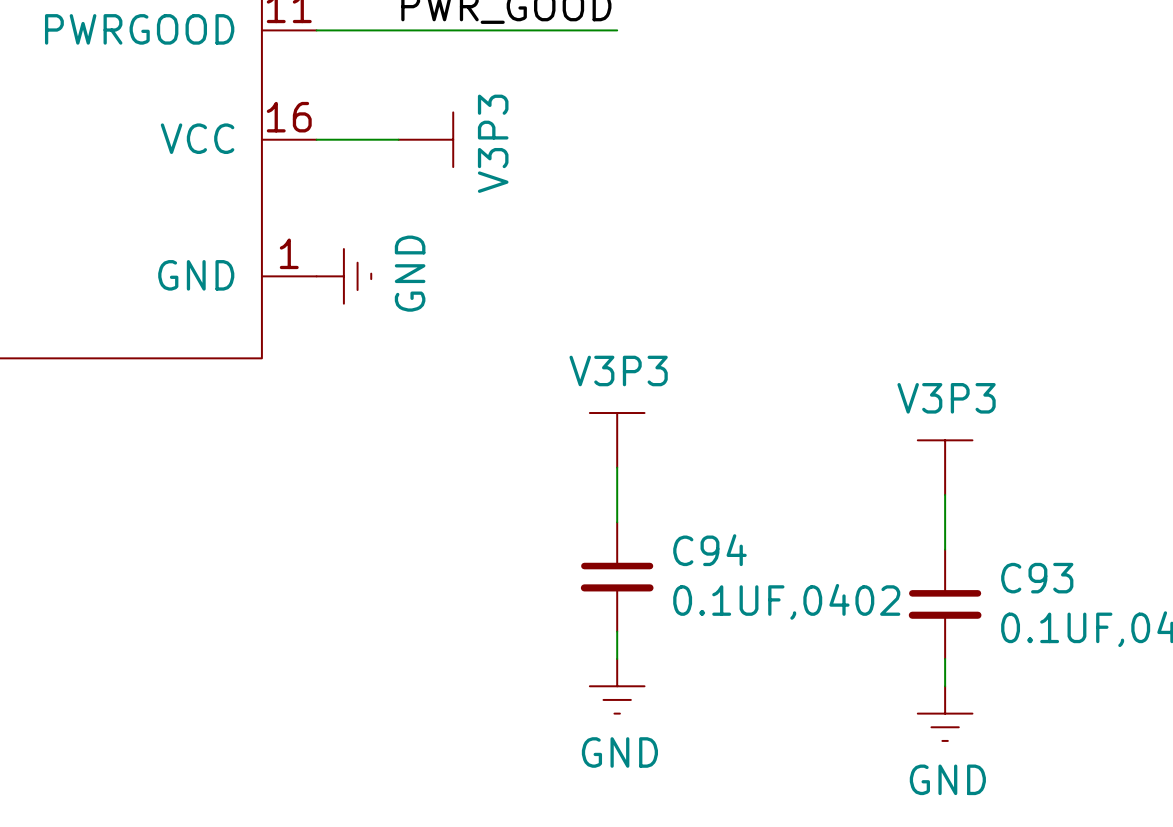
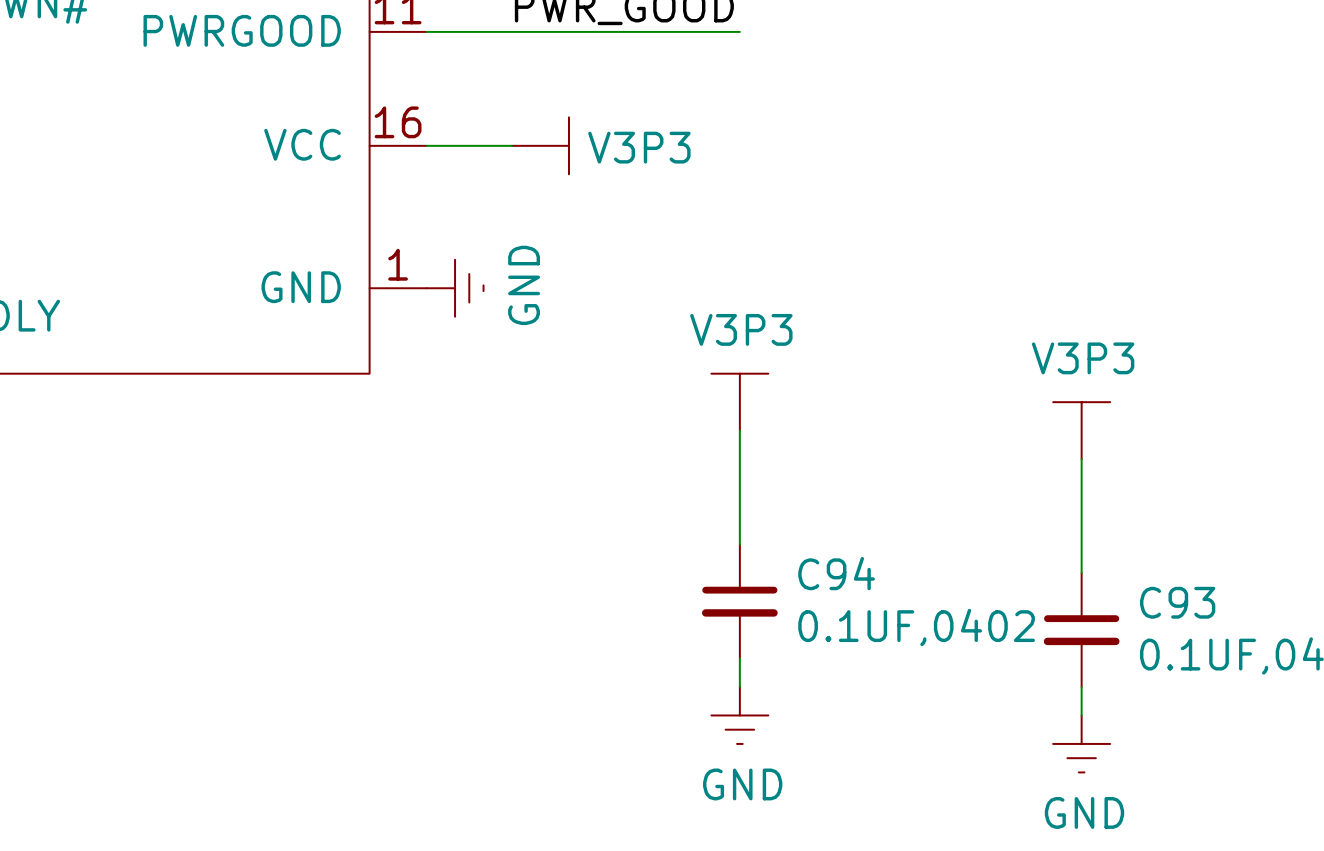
power symbol text rotation: 0° (493, 143) -> 90° clockwise (639, 147)
power symbol position: V3P3 (617, 440) -> V3P3 (739, 402)
power symbol position: V3P3 (945, 467) -> V3P3 (1081, 430)

